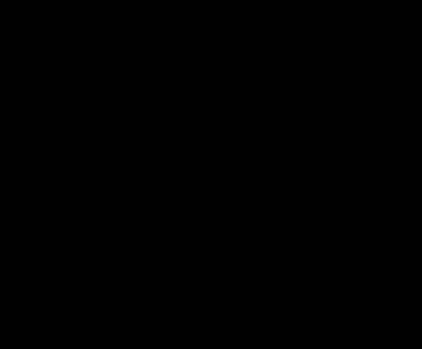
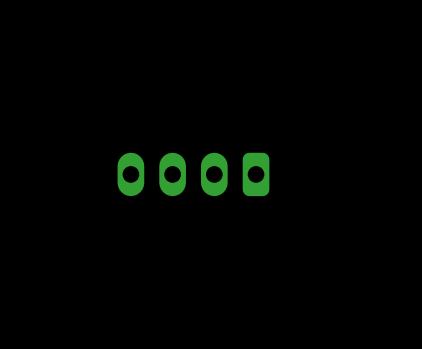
part: none -> (193, 174)

